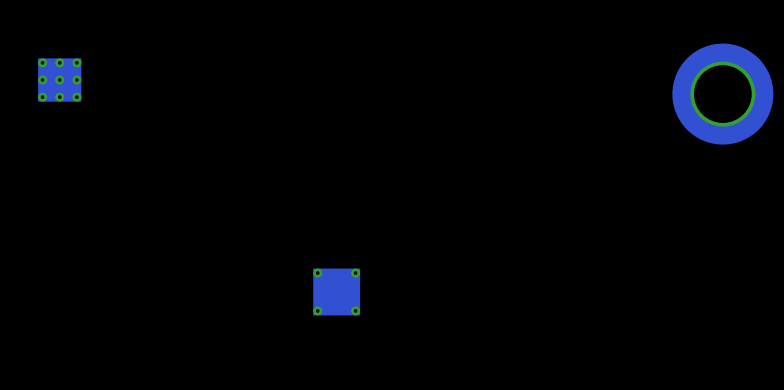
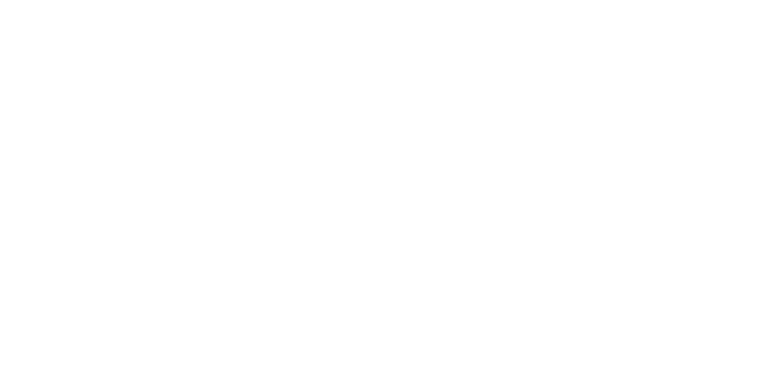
part: (59, 80) -> none
part: (722, 94) -> none
part: (336, 292) -> none

